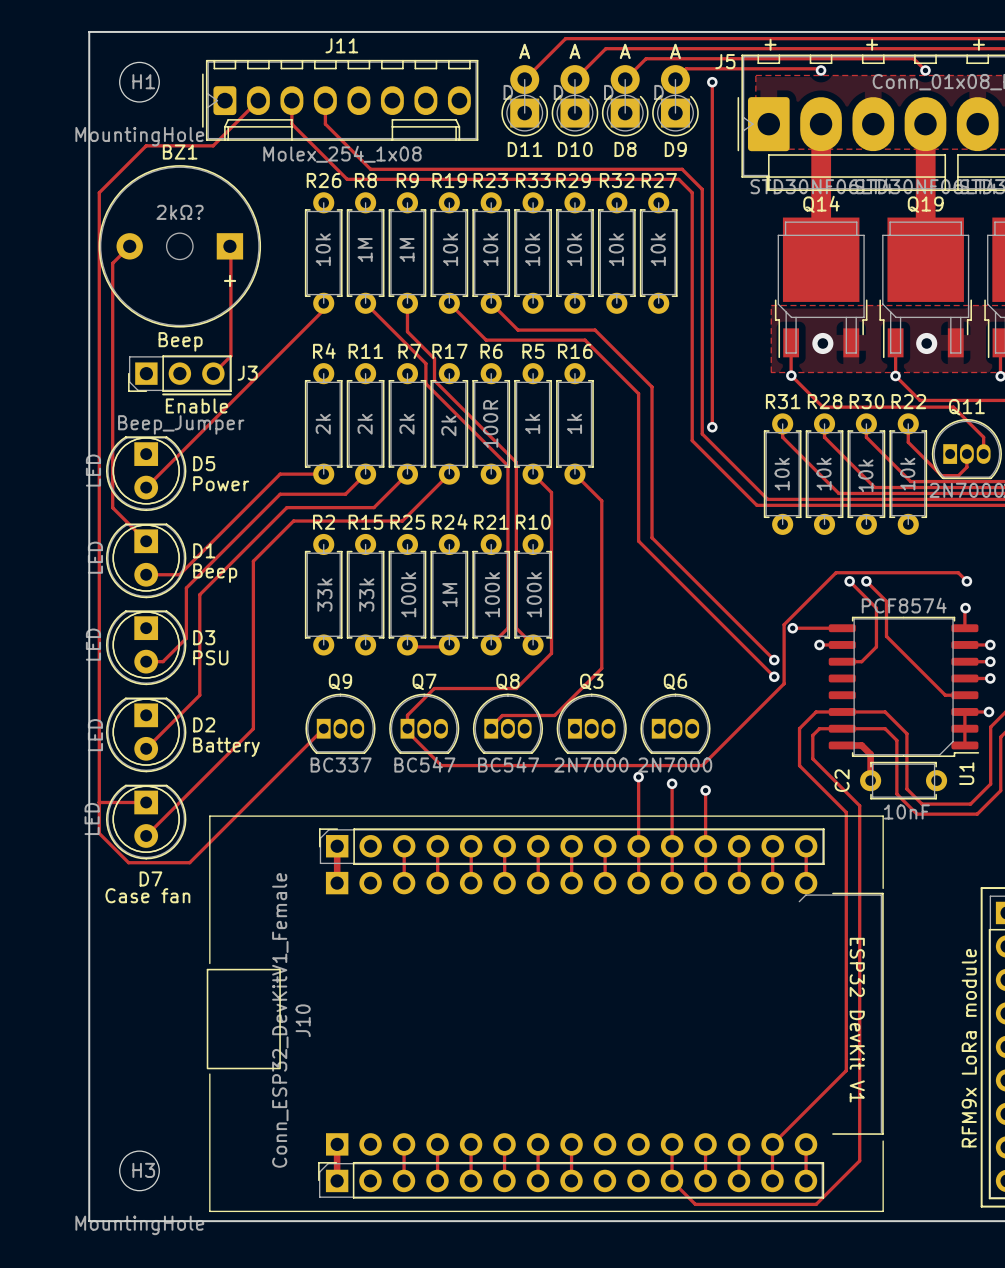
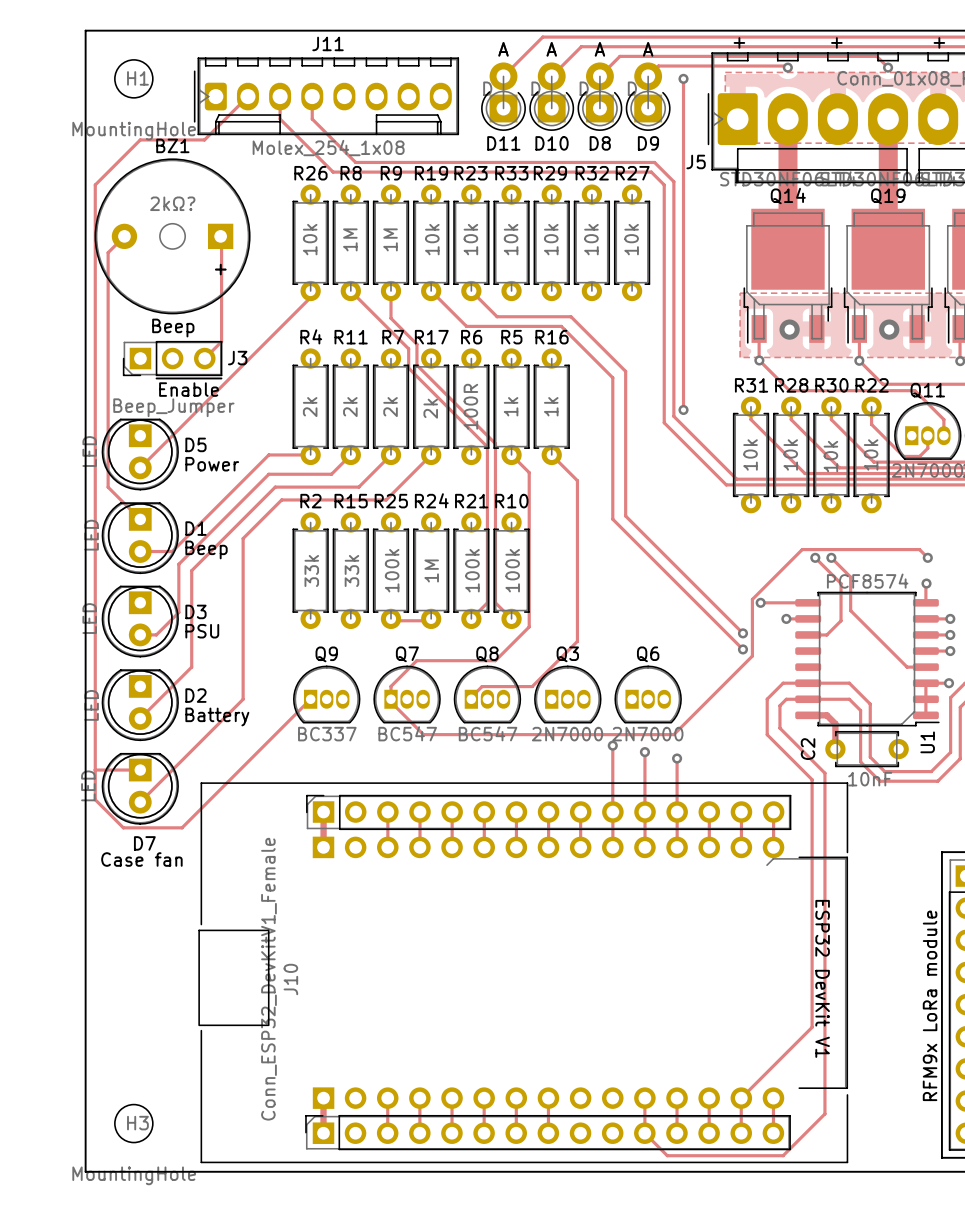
J5 name position: J5 (725, 61) -> J5 (696, 161)

